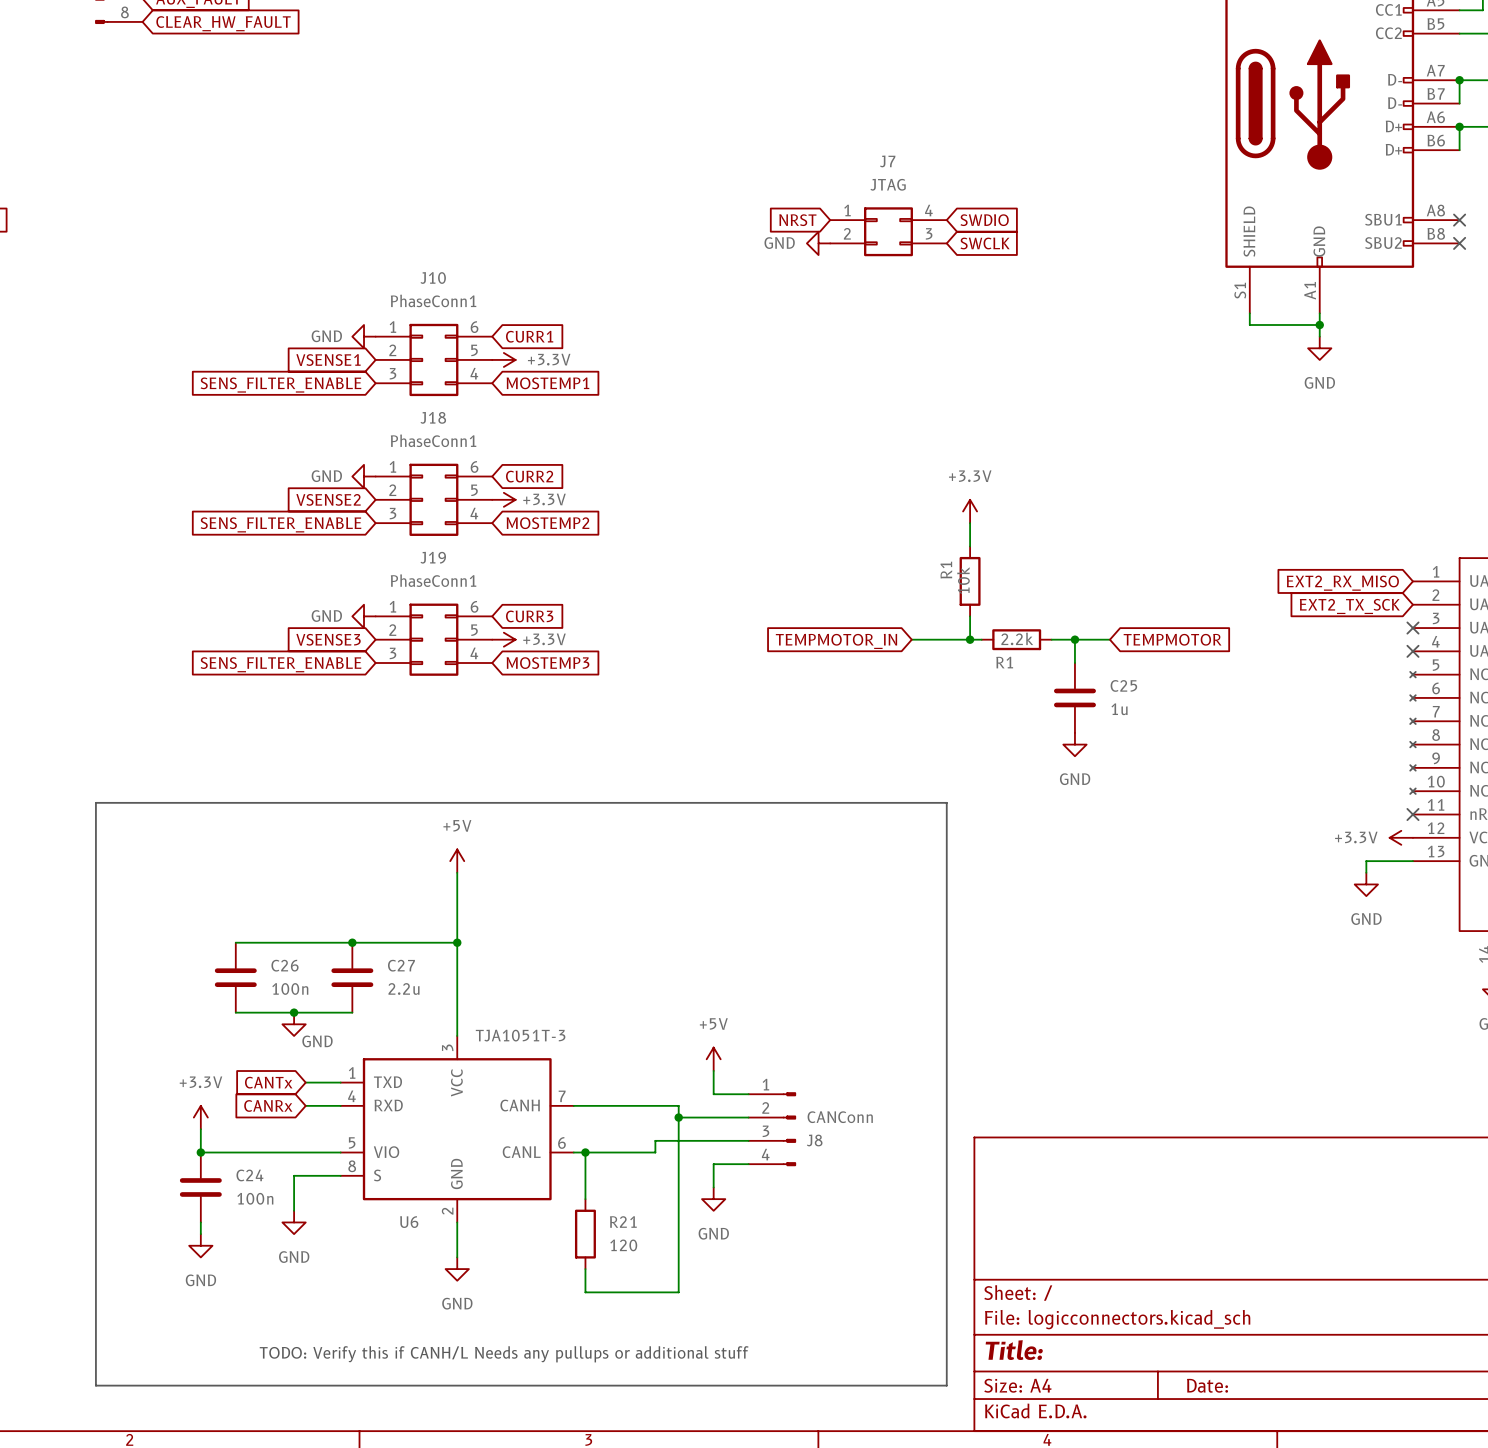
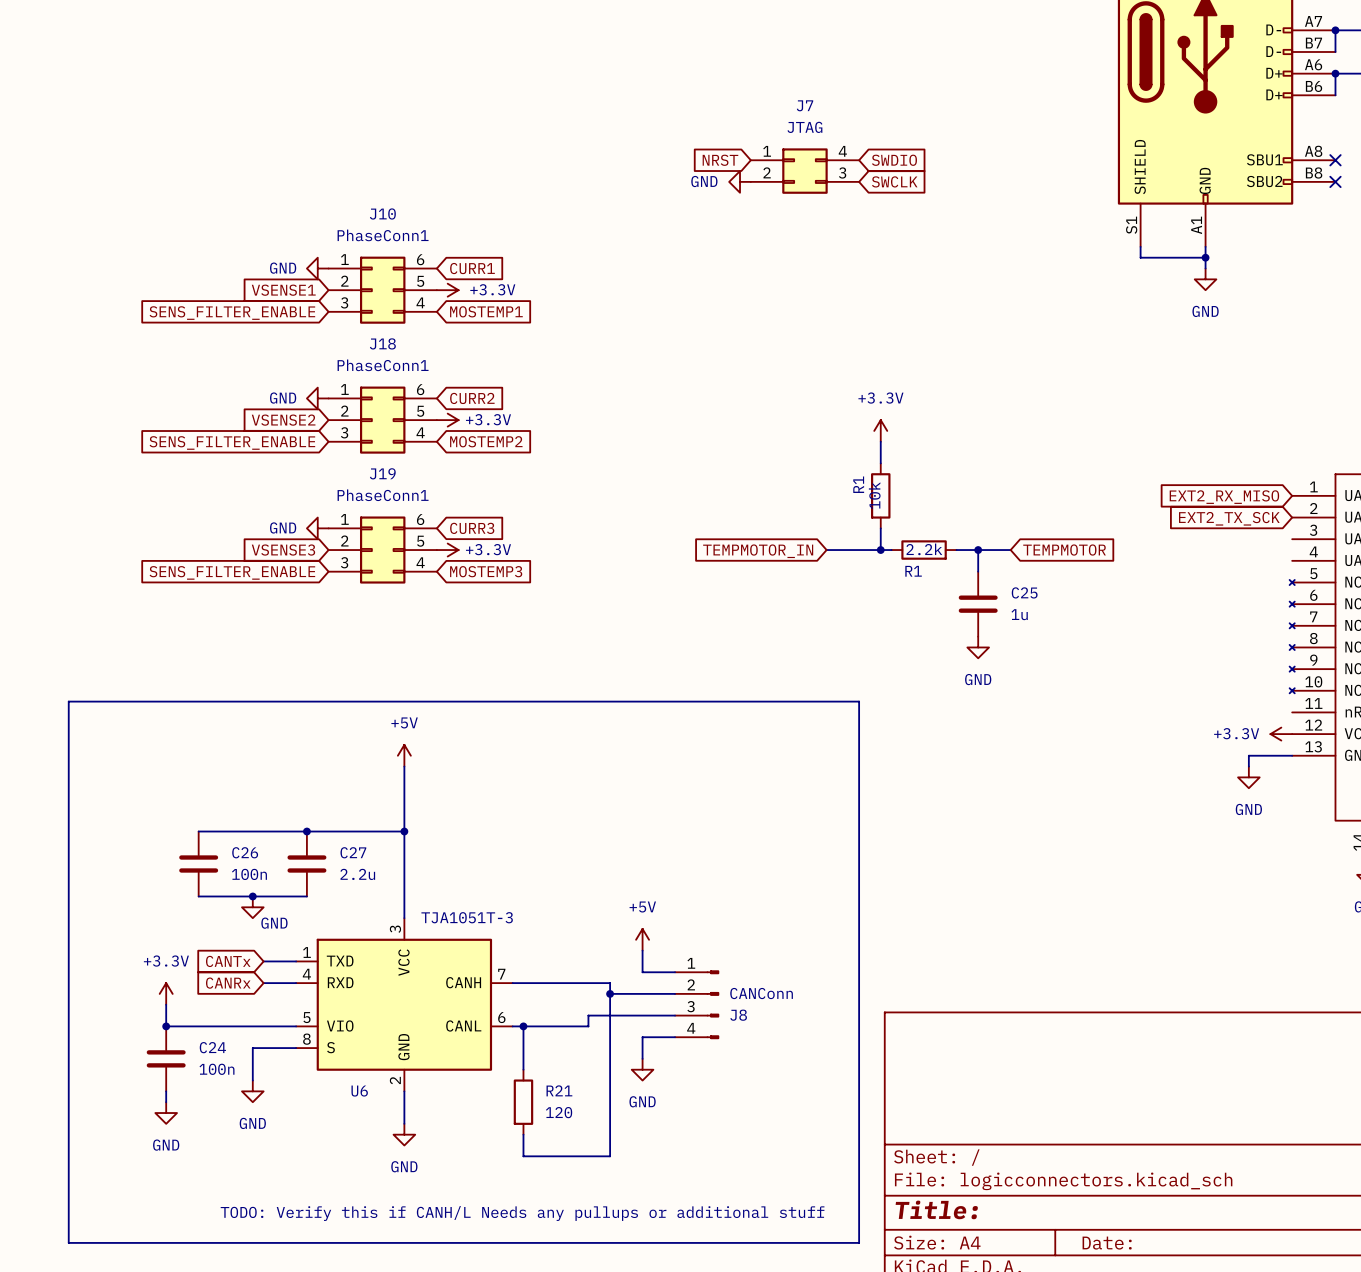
no-connect mark: (1412, 628) -> none
no-connect mark: (1412, 651) -> none
no-connect mark: (1412, 814) -> none

